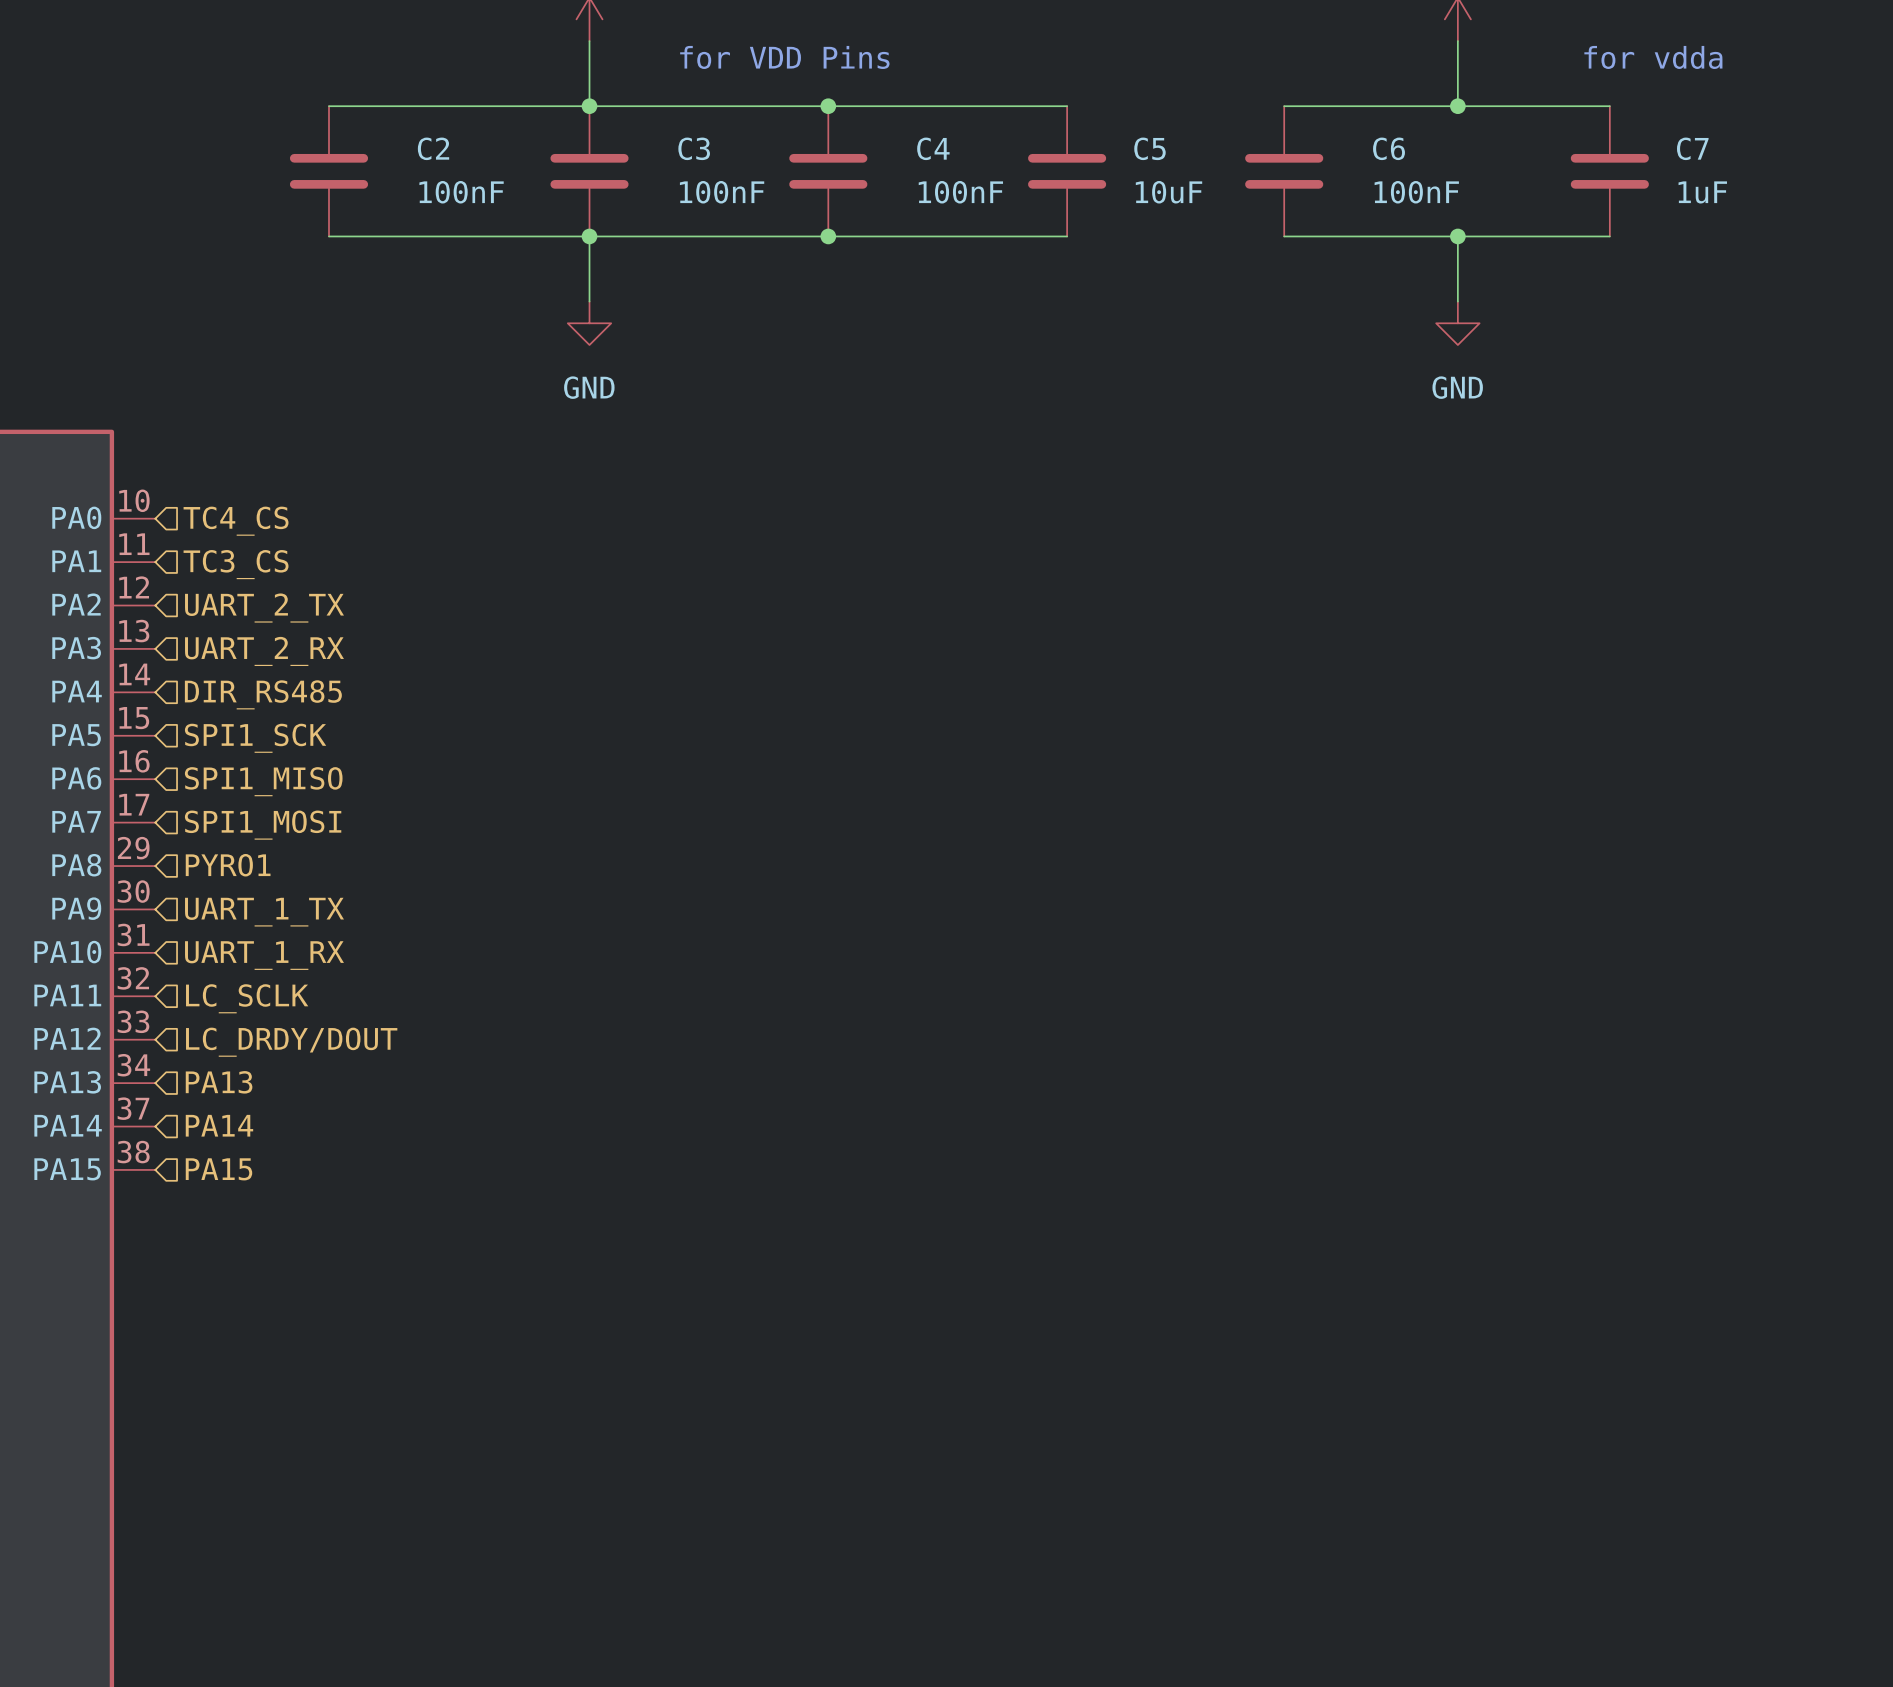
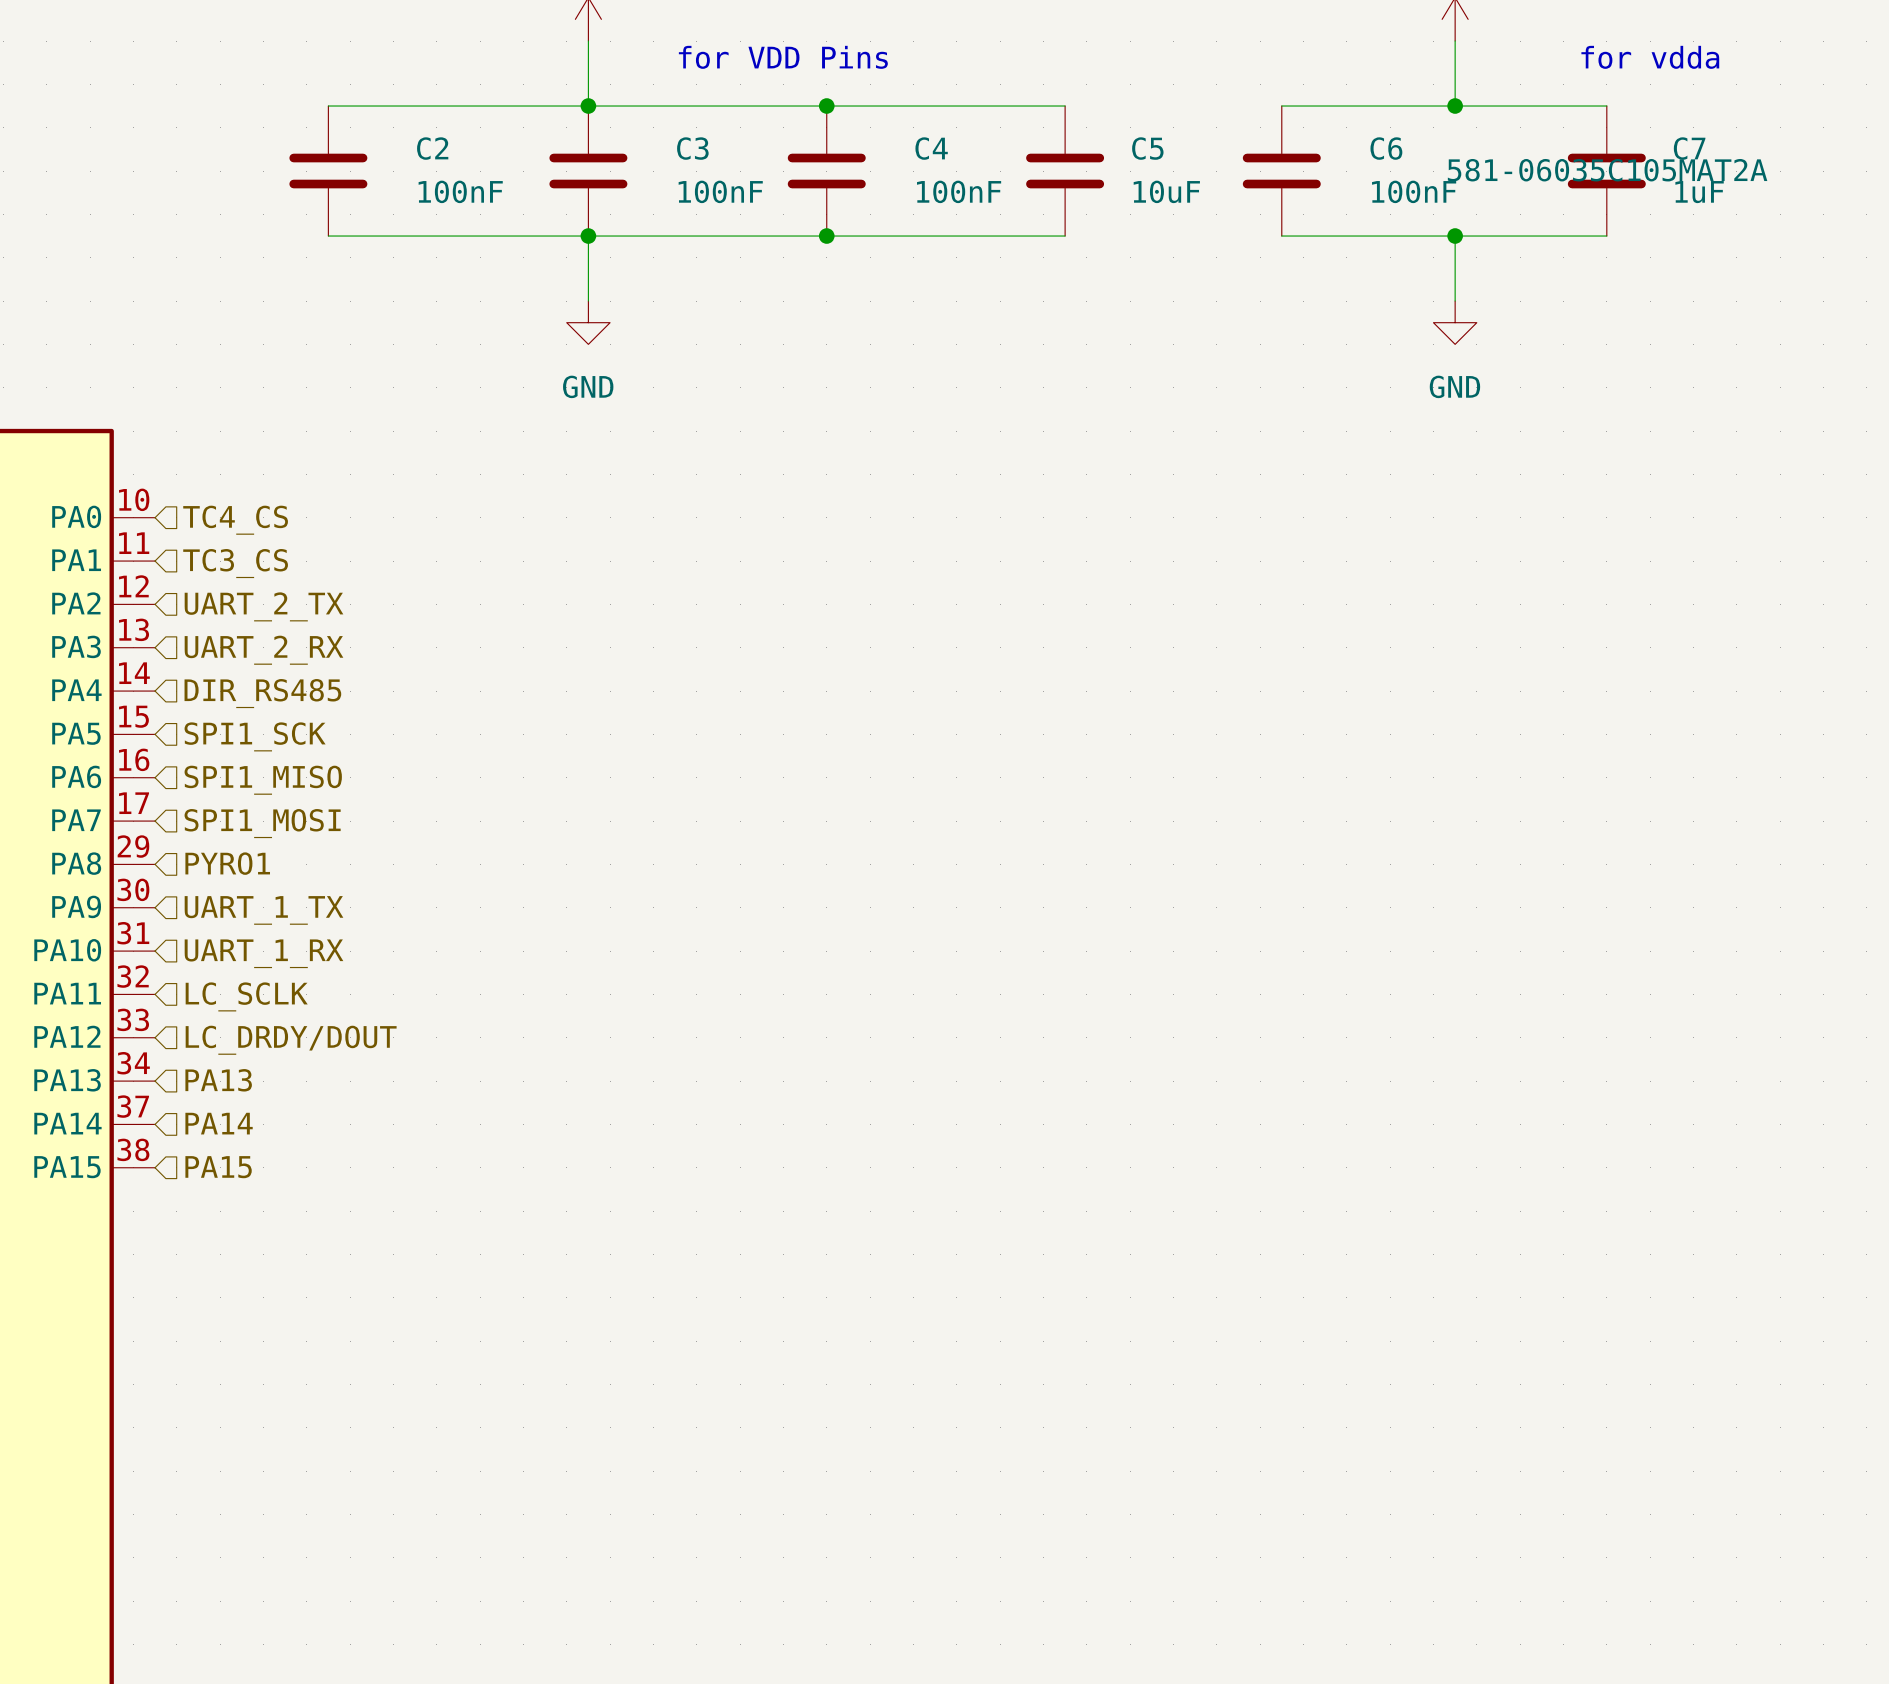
C7 text: none -> 581-06035C105MAT2A (1607, 170)

